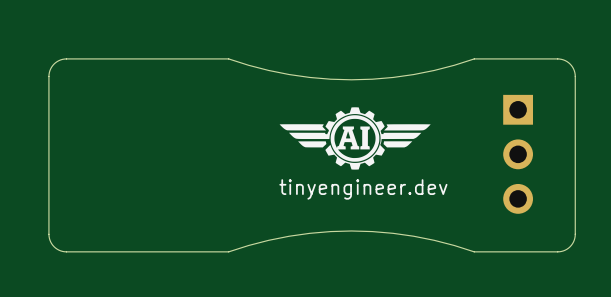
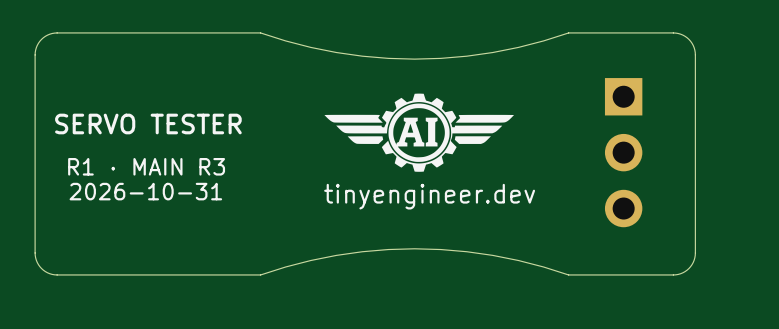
text: none -> SERVO TESTER (148, 123)
text: none -> R1 · MAIN R3 (146, 166)
text: none -> 2026-10-31 (145, 191)

